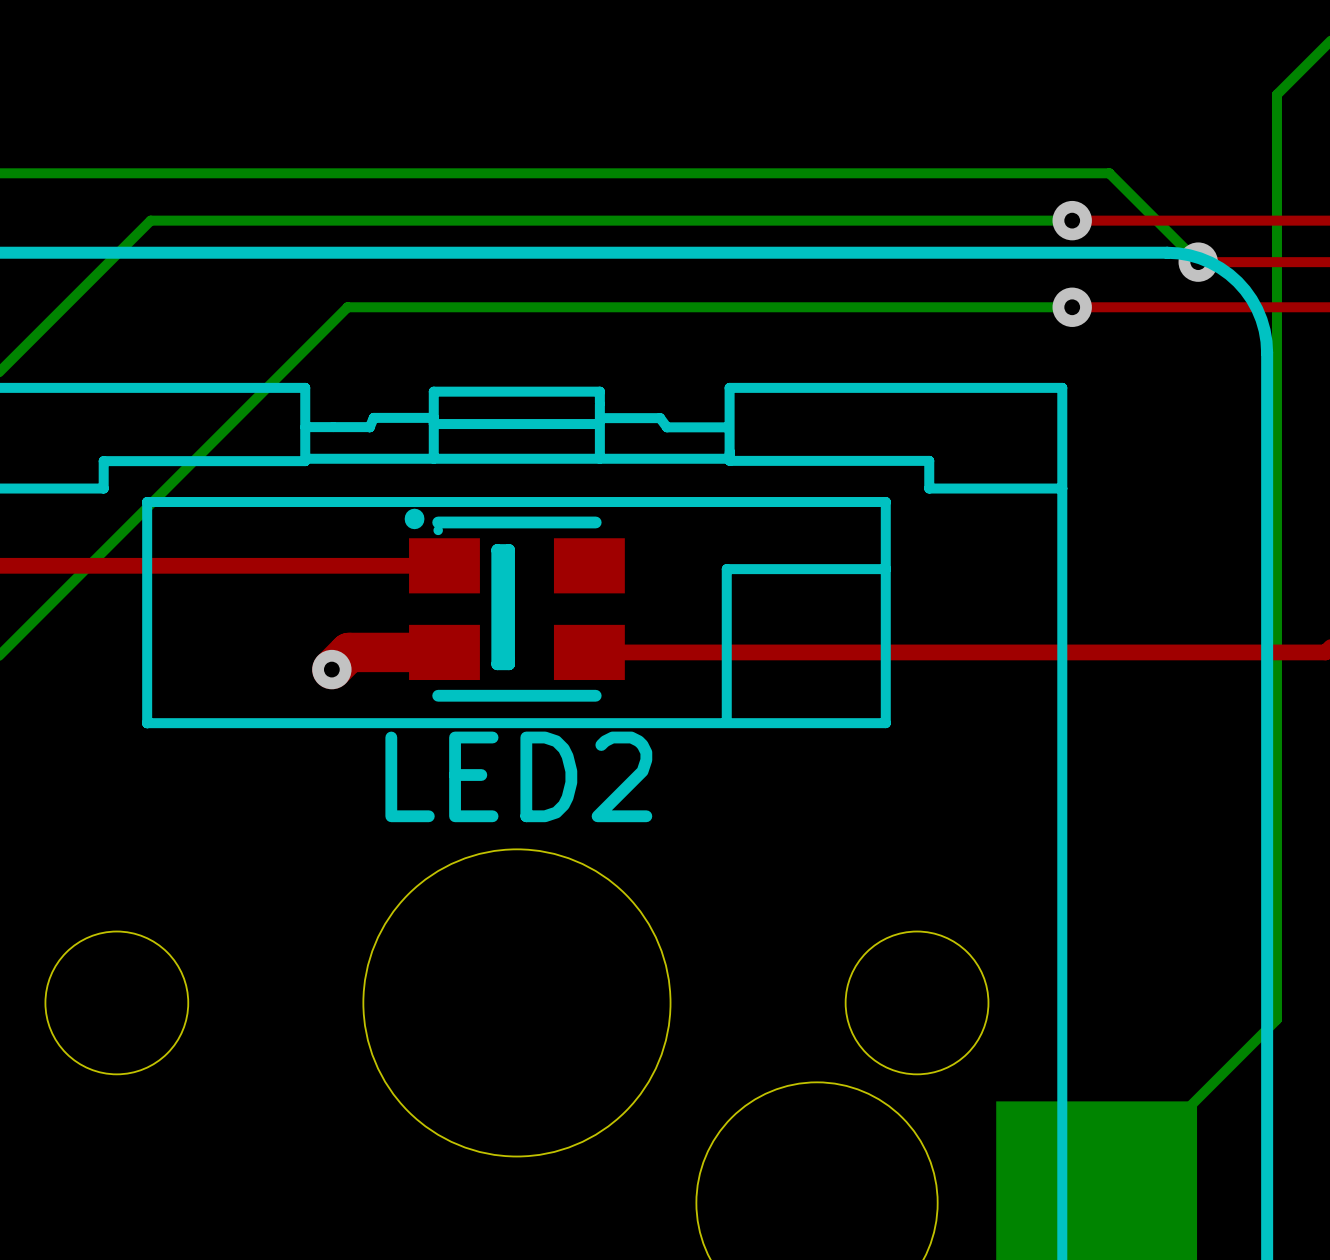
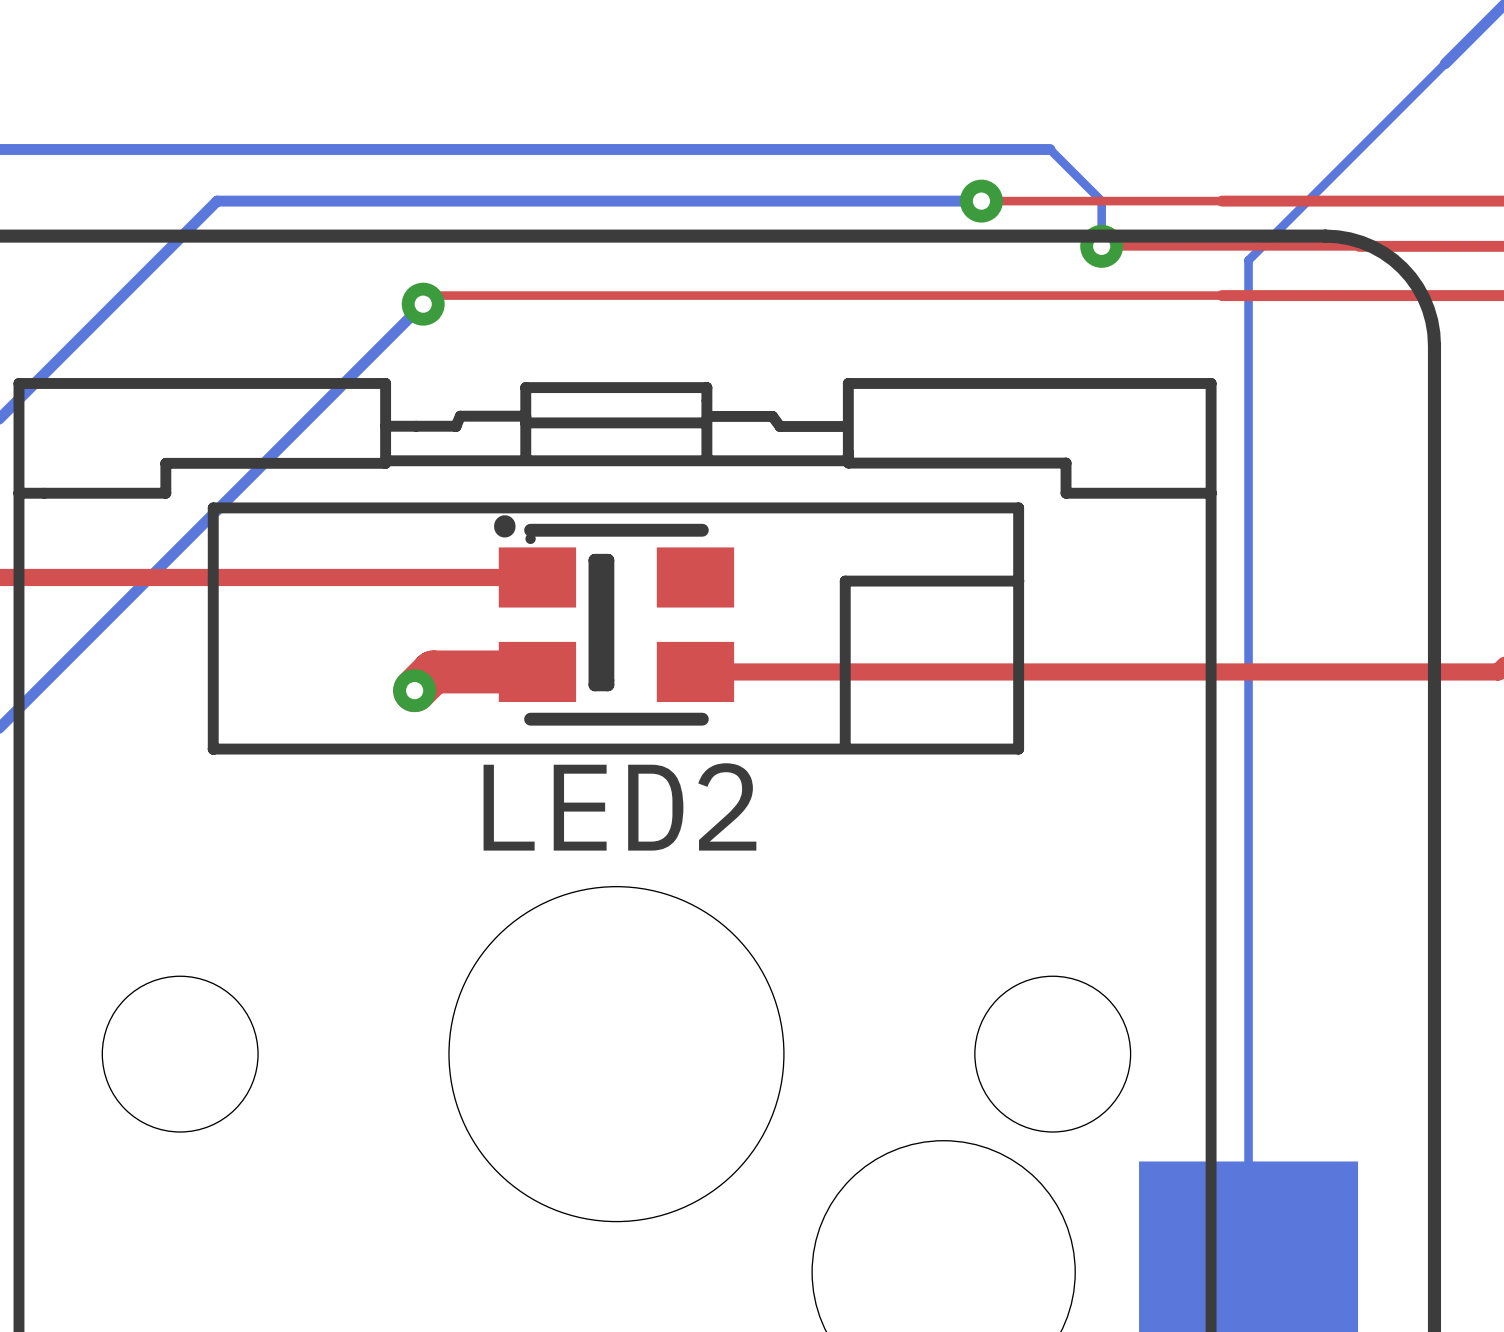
bottom track: (1276, 94) (1276, 1019) (1096, 1199) -> (1445, 63) (1248, 260) (1248, 1268)
bottom track: (914, 173) (1109, 173) (1198, 262) -> (1050, 149) (1101, 201) (1101, 246)
top track: none -> (981, 201) (1221, 201)
bottom track: (851, 220) (1072, 220) -> none
via: none -> (981, 201)
via: (1072, 220) -> none
top track: none -> (1101, 246) (1359, 246)
via: none -> (1101, 246)
via: (1198, 262) -> none
top track: none -> (1221, 295) (431, 295) (423, 304)
bottom track: (1072, 307) (347, 307) (339, 315) -> none
via: (1072, 307) -> none
via: none -> (423, 304)

